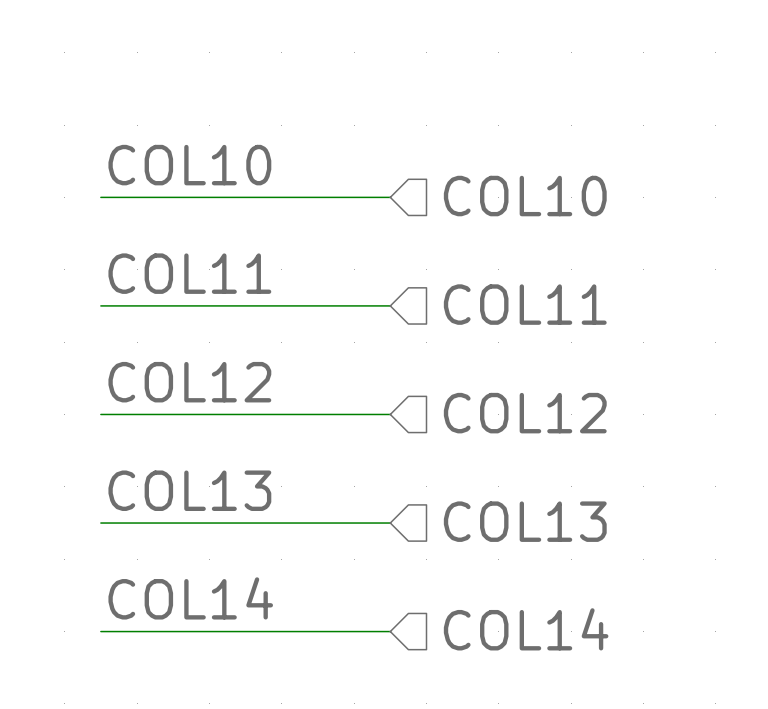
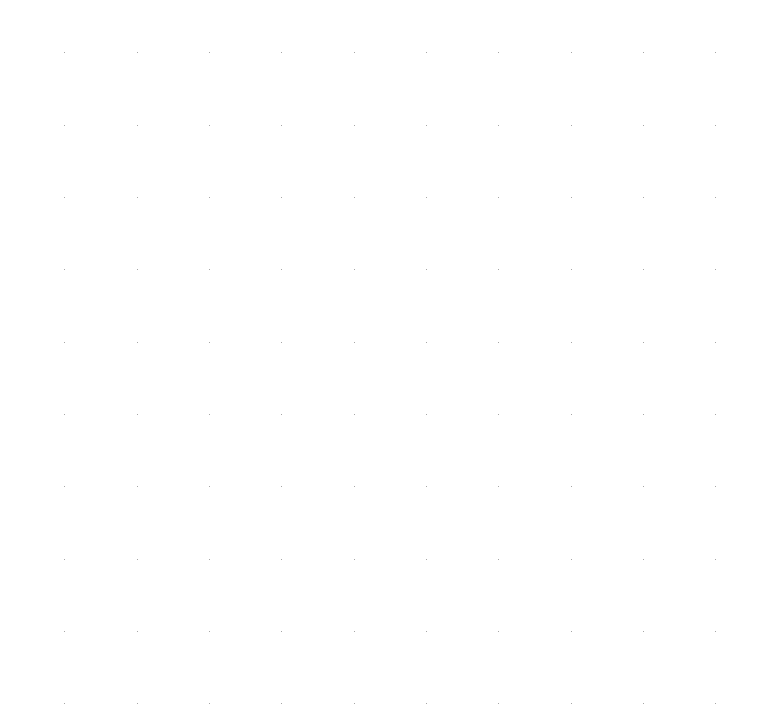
label: COL10 (189, 165) -> none
hierarchical label: COL10 (525, 196) -> none
wire: (100, 197) (390, 197) -> none
label: COL11 (189, 273) -> none
hierarchical label: COL11 (525, 304) -> none
wire: (100, 305) (390, 305) -> none
label: COL12 (189, 382) -> none
hierarchical label: COL12 (525, 413) -> none
wire: (100, 414) (390, 414) -> none
label: COL13 (189, 490) -> none
hierarchical label: COL13 (525, 521) -> none
wire: (100, 523) (390, 523) -> none
label: COL14 (190, 598) -> none
hierarchical label: COL14 (526, 629) -> none
wire: (100, 631) (390, 631) -> none

